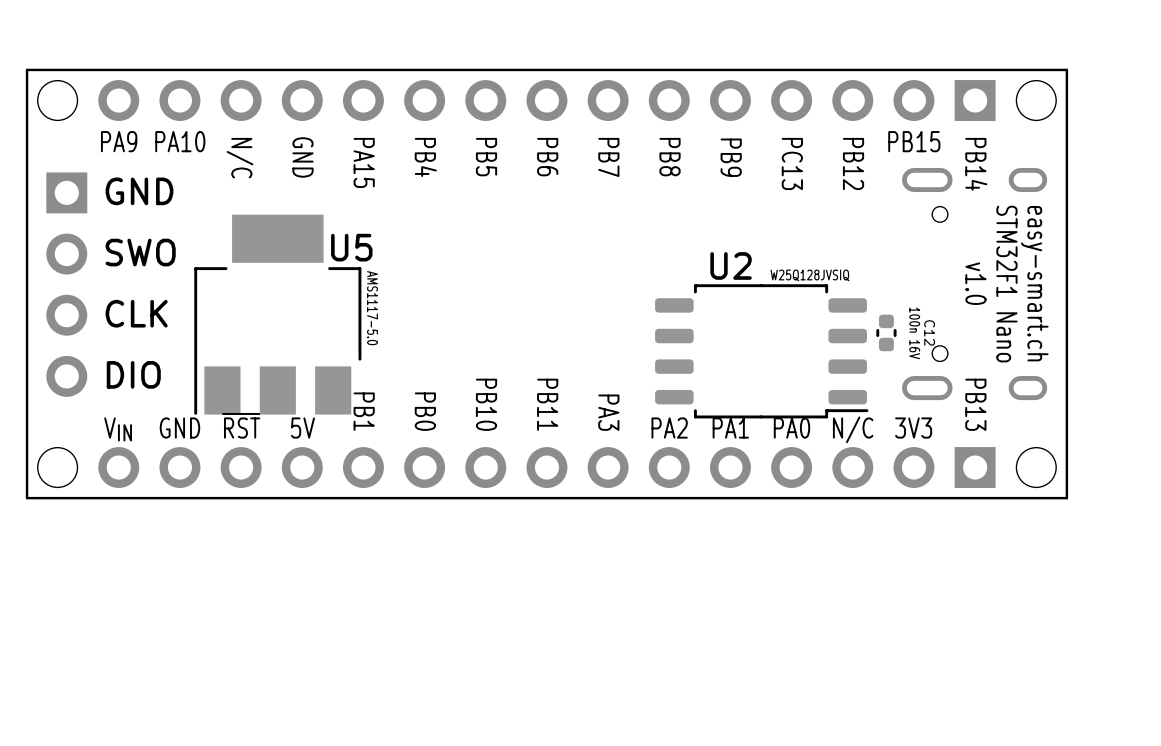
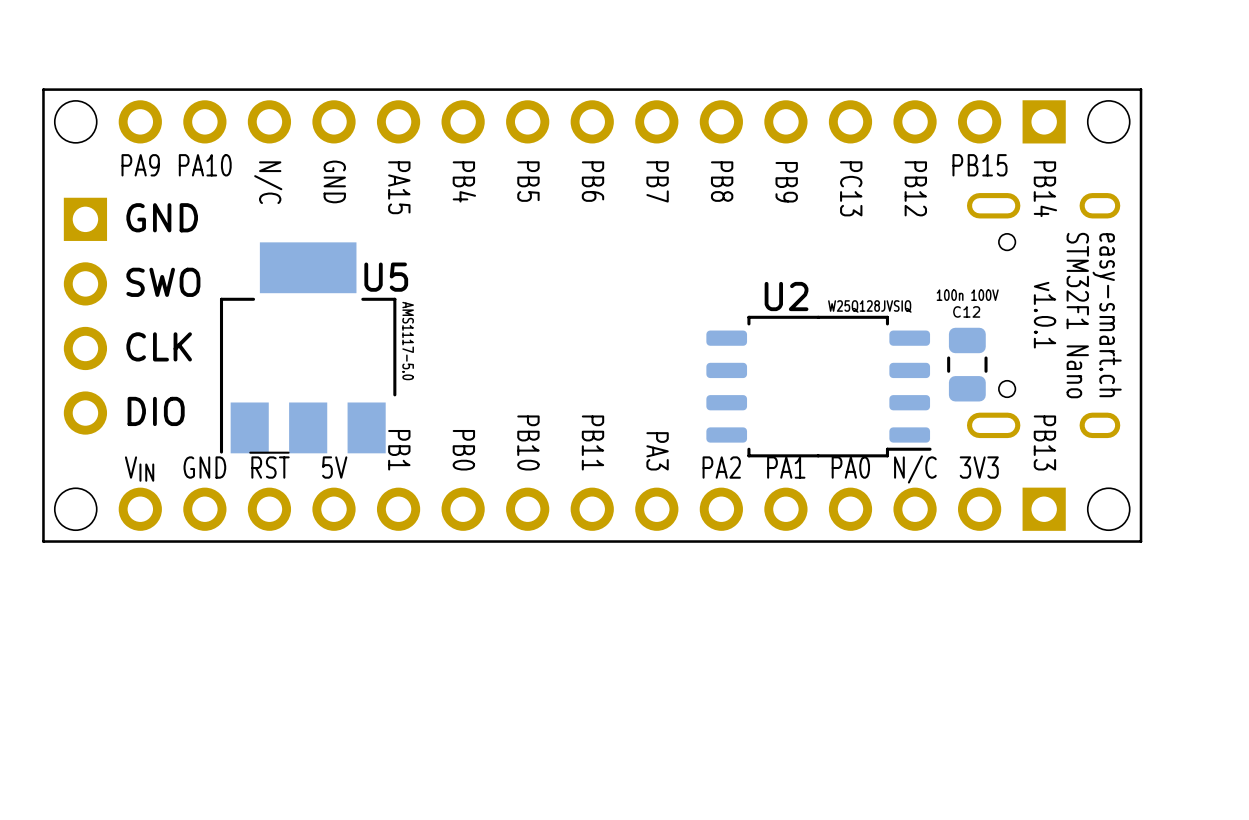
text: v1.0 (975, 283) -> v1.0.1 (1045, 315)
C12 footprint: [876, 314, 897, 352] -> [947, 327, 988, 402]
C12 name position: C12 (929, 332) -> C12 (966, 311)
C12 value: 100n 16V (914, 333) -> 100n 100V (967, 295)

